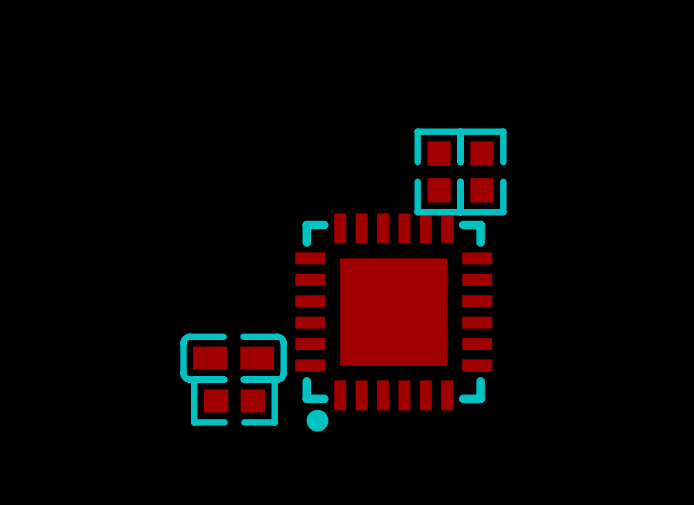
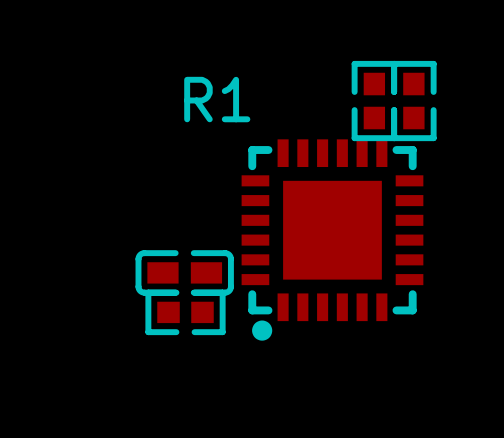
R1 name: none -> R1 (217, 99)

